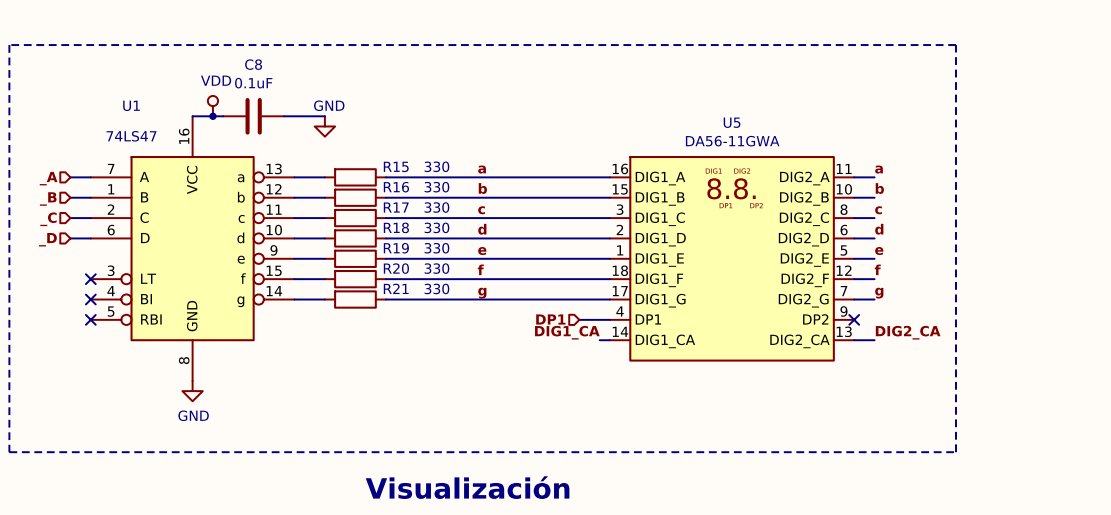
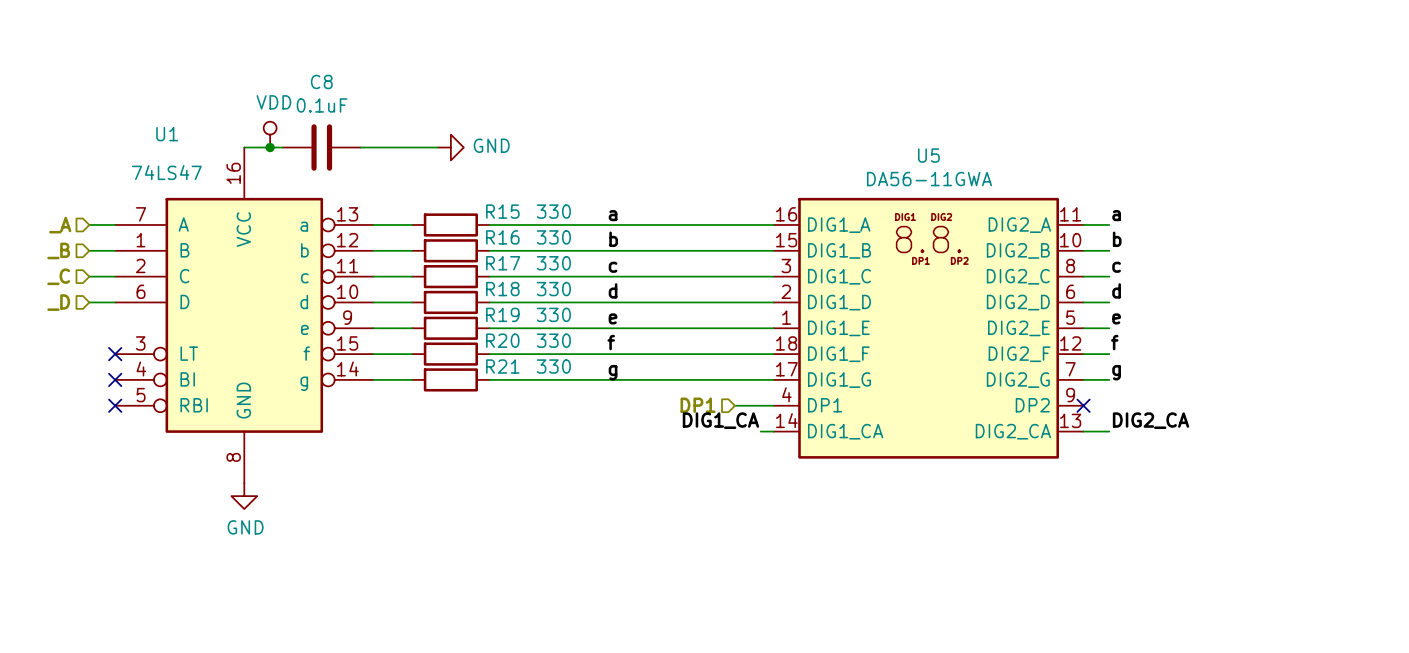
line: (9, 45) (955, 45) (955, 452) (9, 452) (9, 45) -> none
power symbol text position: GND (329, 105) -> GND (491, 145)
wire: none -> (412, 147) (437, 147)
power symbol rotation: 0° (324, 126) -> 90° counterclockwise (450, 147)
power symbol position: GND (324, 126) -> GND (450, 147)
text: Visualización (467, 487) -> none

